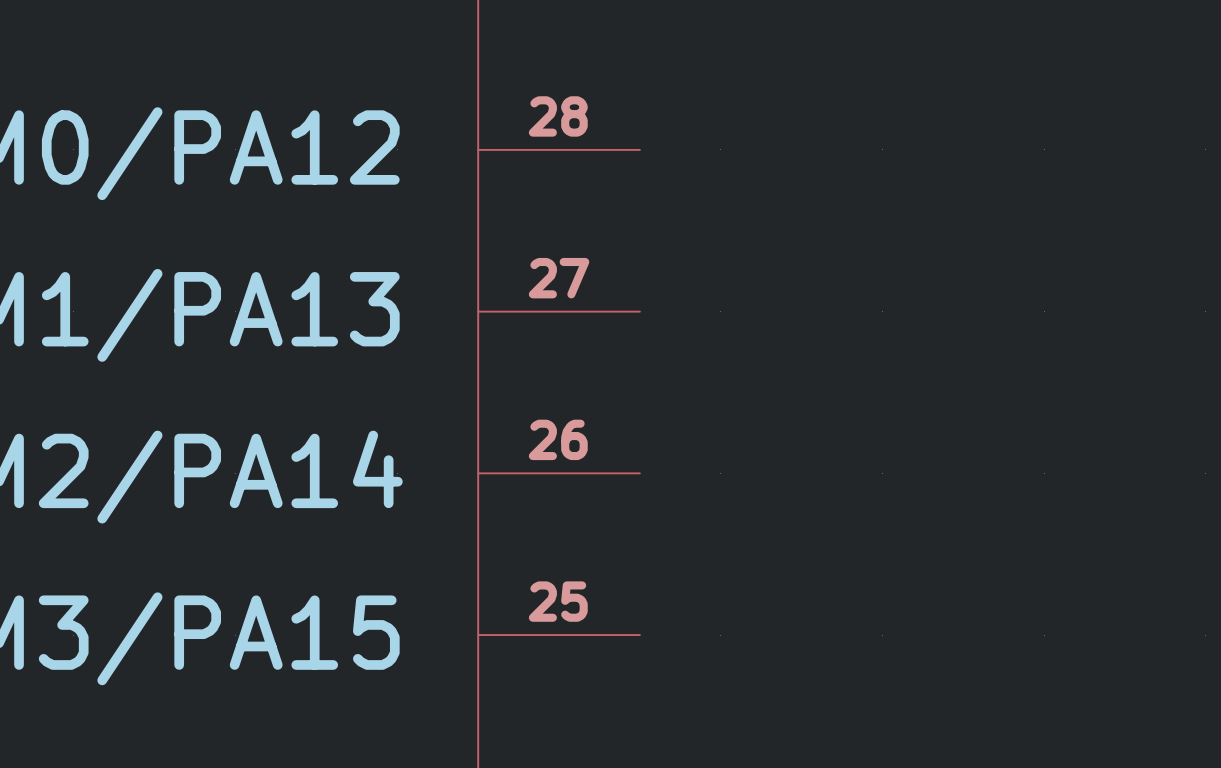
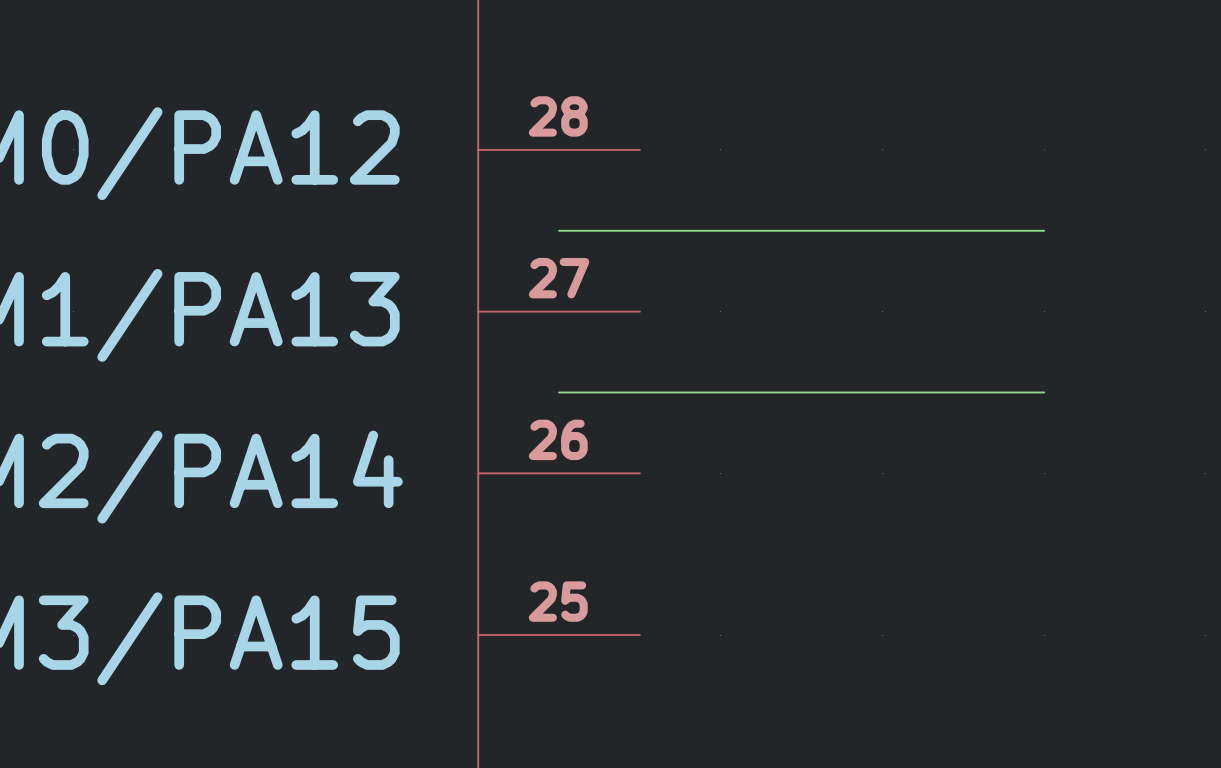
wire: none -> (559, 230) (1044, 230)
wire: none -> (559, 392) (1044, 392)

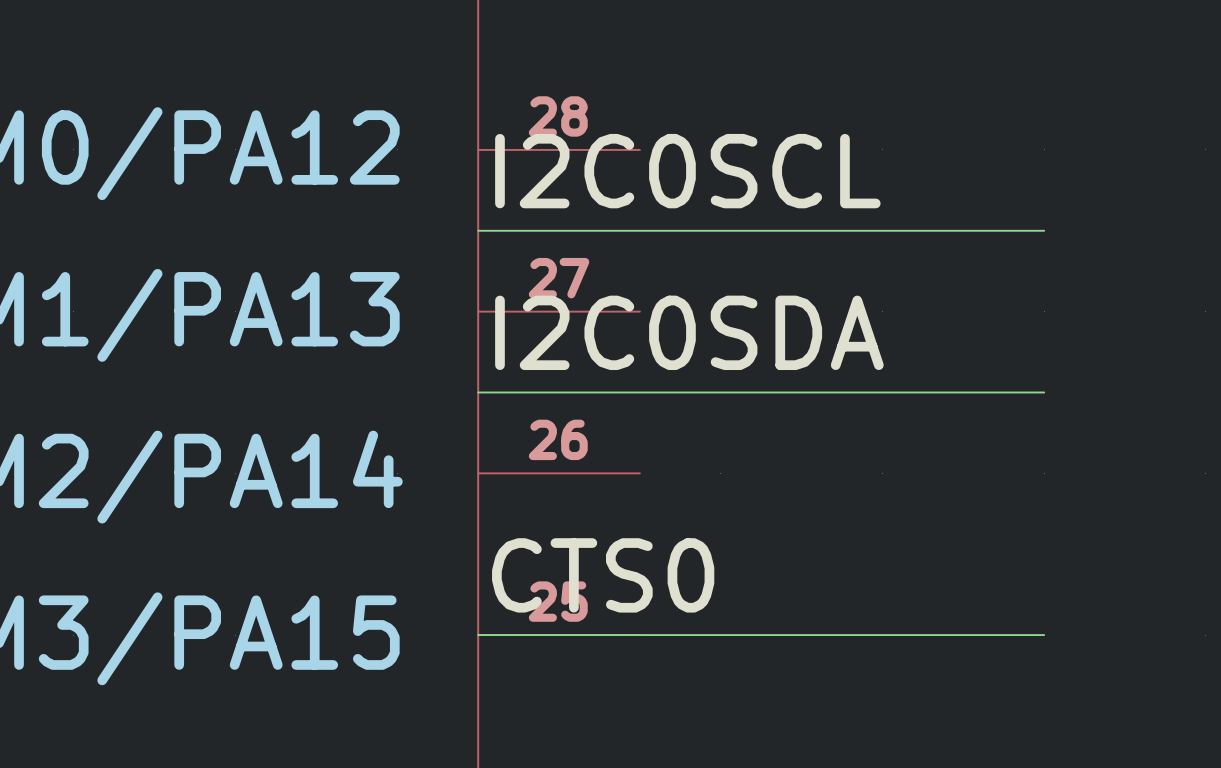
label: none -> I2C0SCL (687, 171)
wire: none -> (478, 230) (559, 230)
label: none -> I2C0SDA (689, 332)
wire: none -> (478, 392) (559, 392)
label: none -> CTS0 (603, 575)
wire: none -> (478, 635) (1044, 635)

